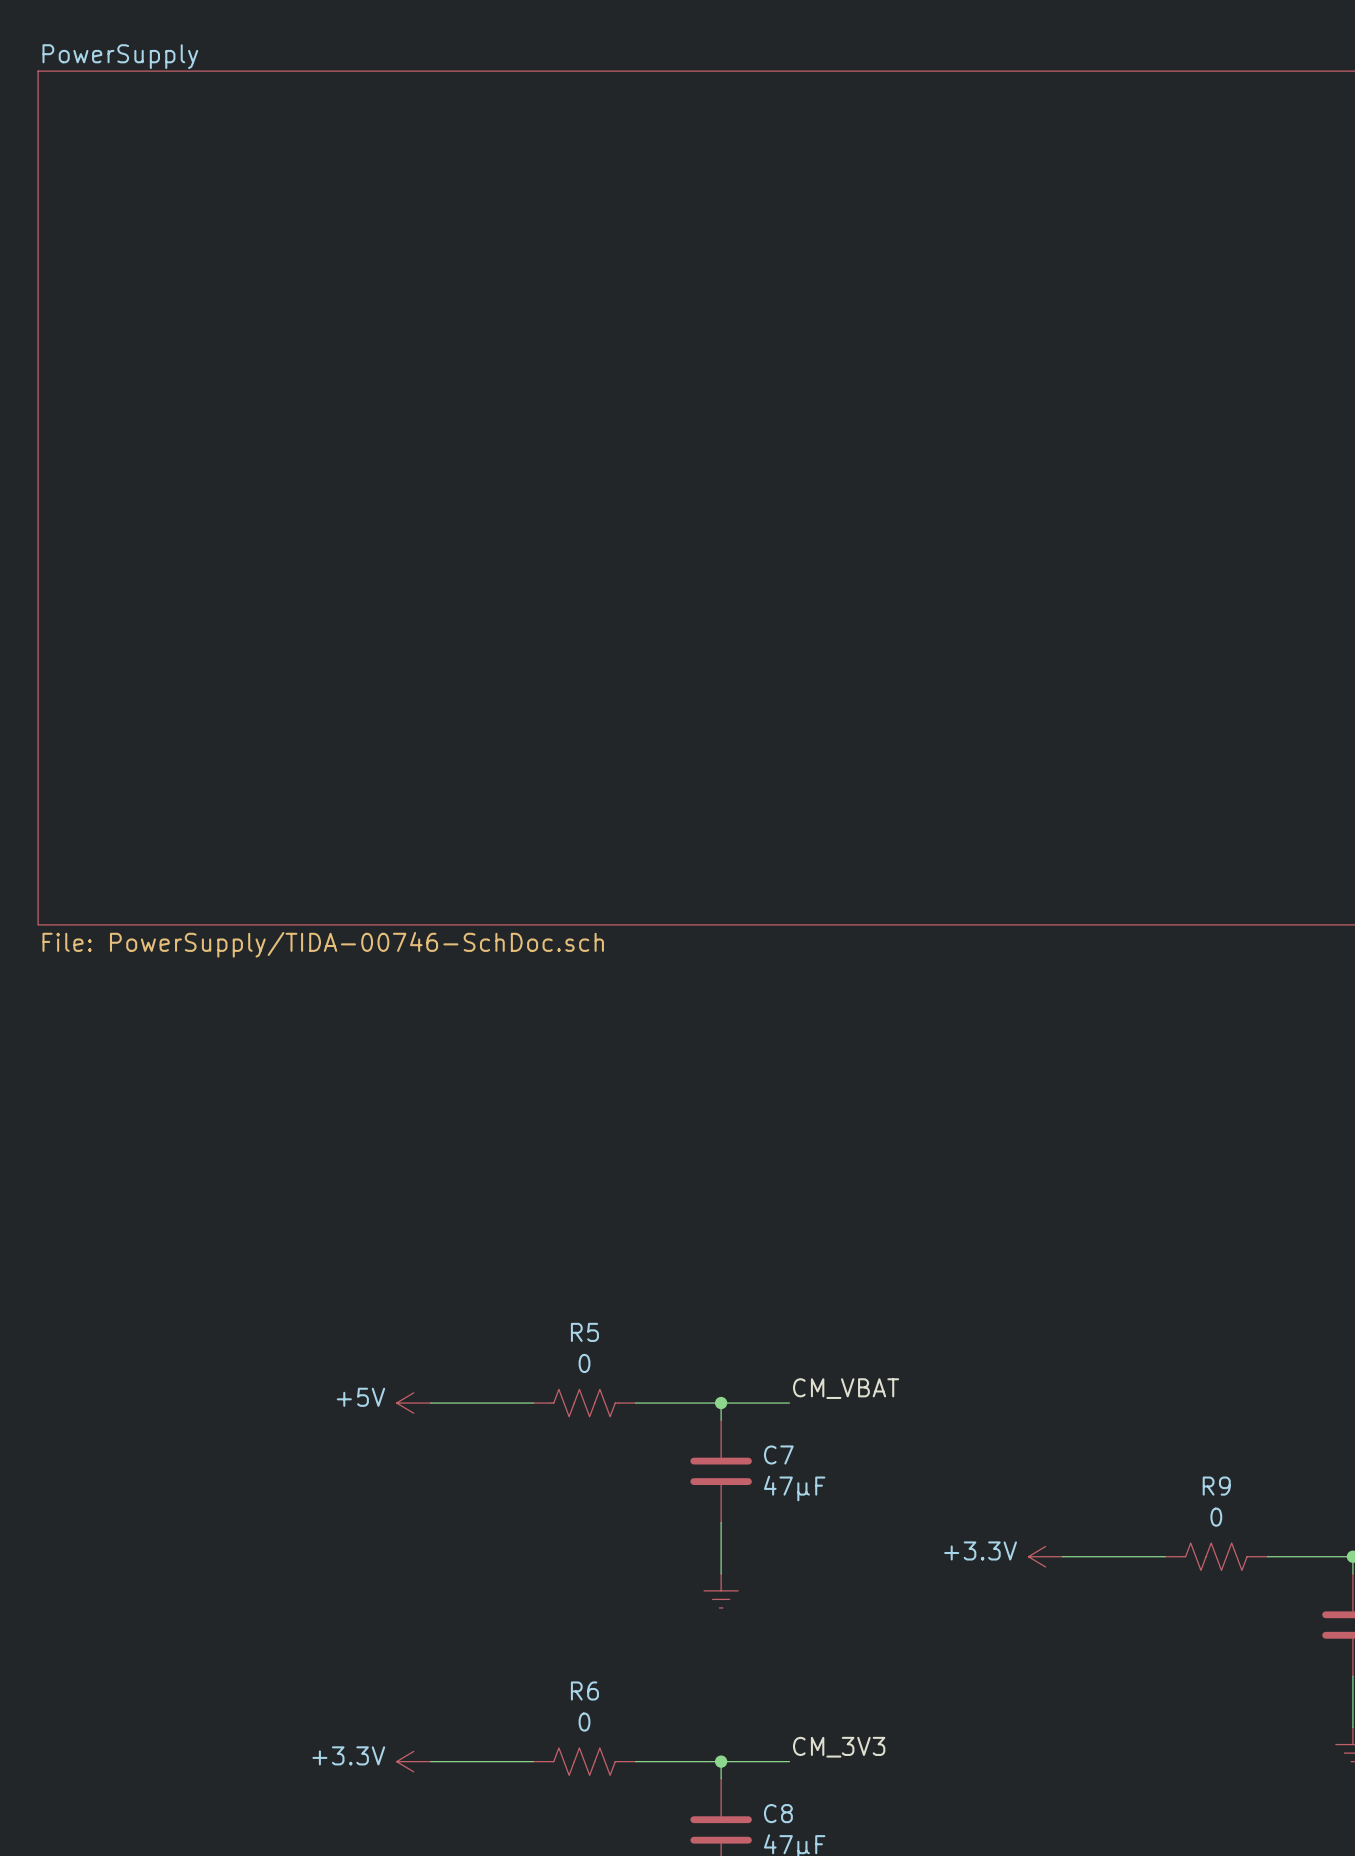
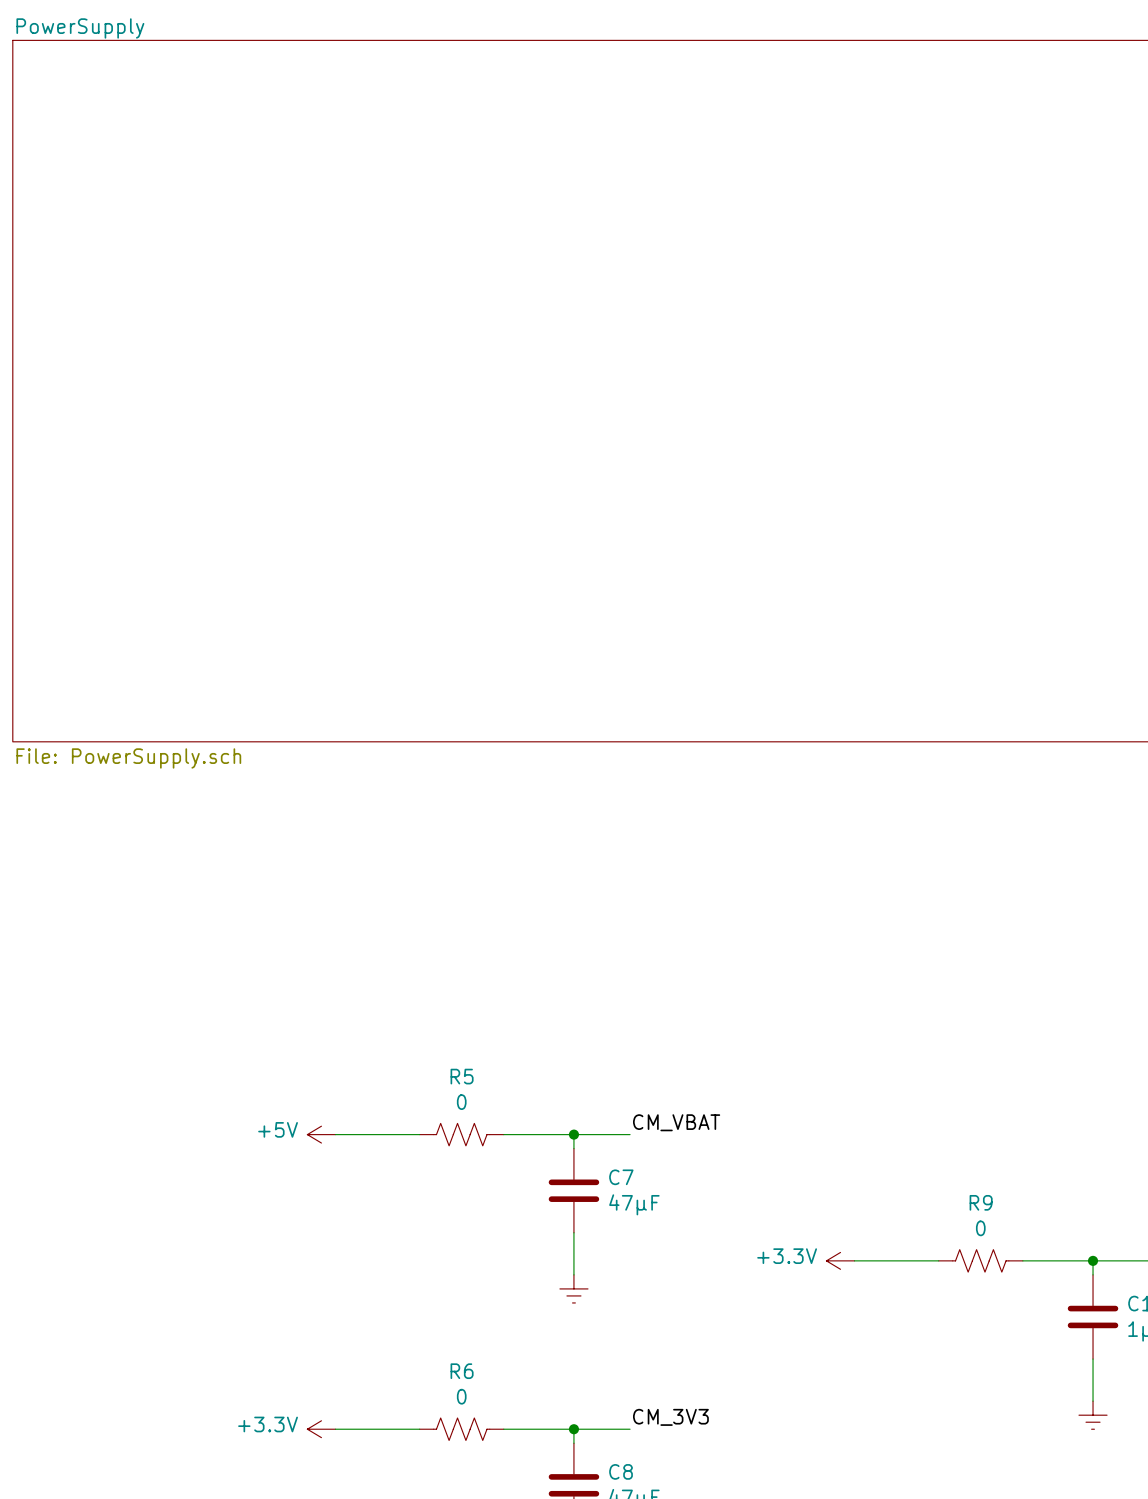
sheet PowerSupply value: File: PowerSupply/TIDA-00746-SchDoc.sch (323, 944) -> File: PowerSupply.sch (128, 758)

